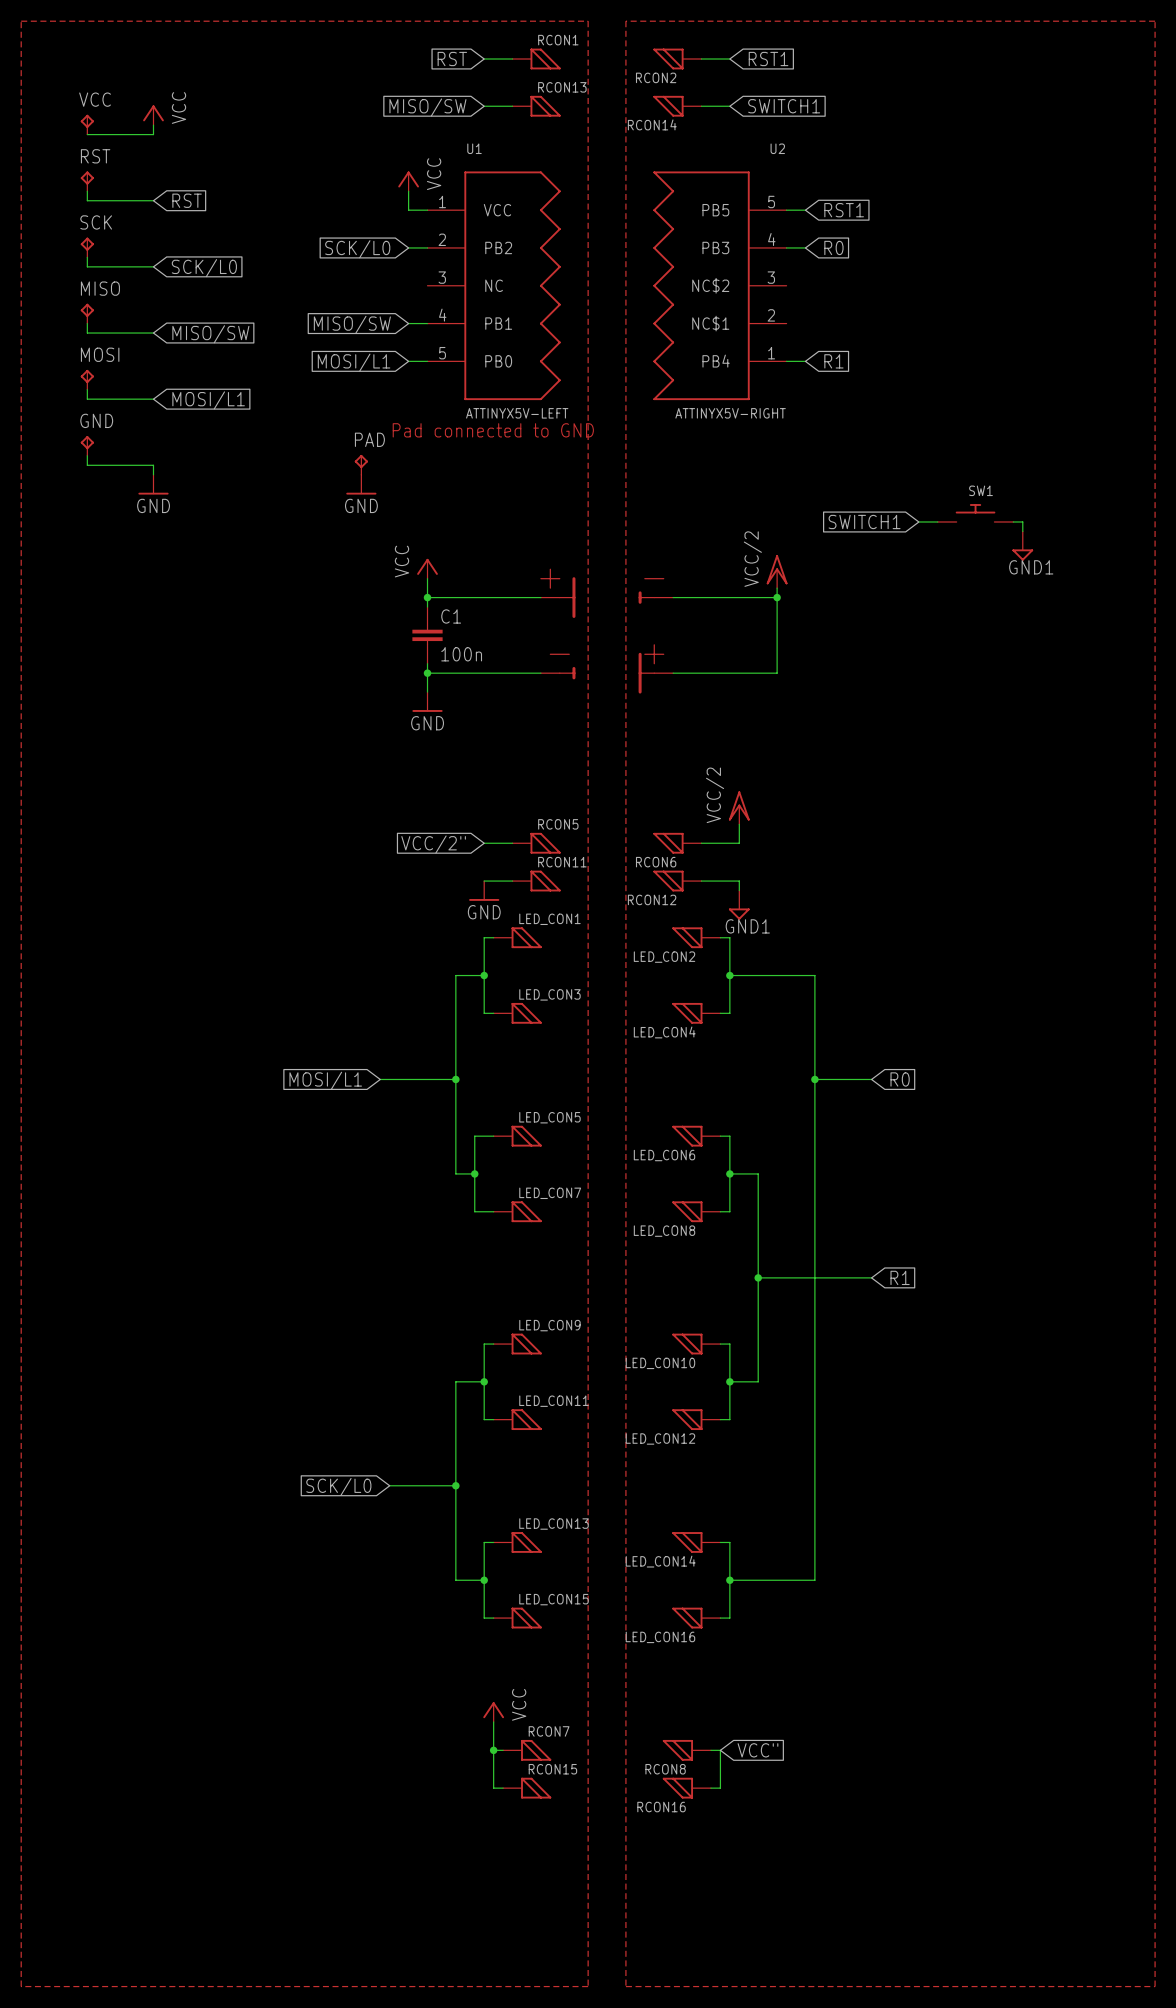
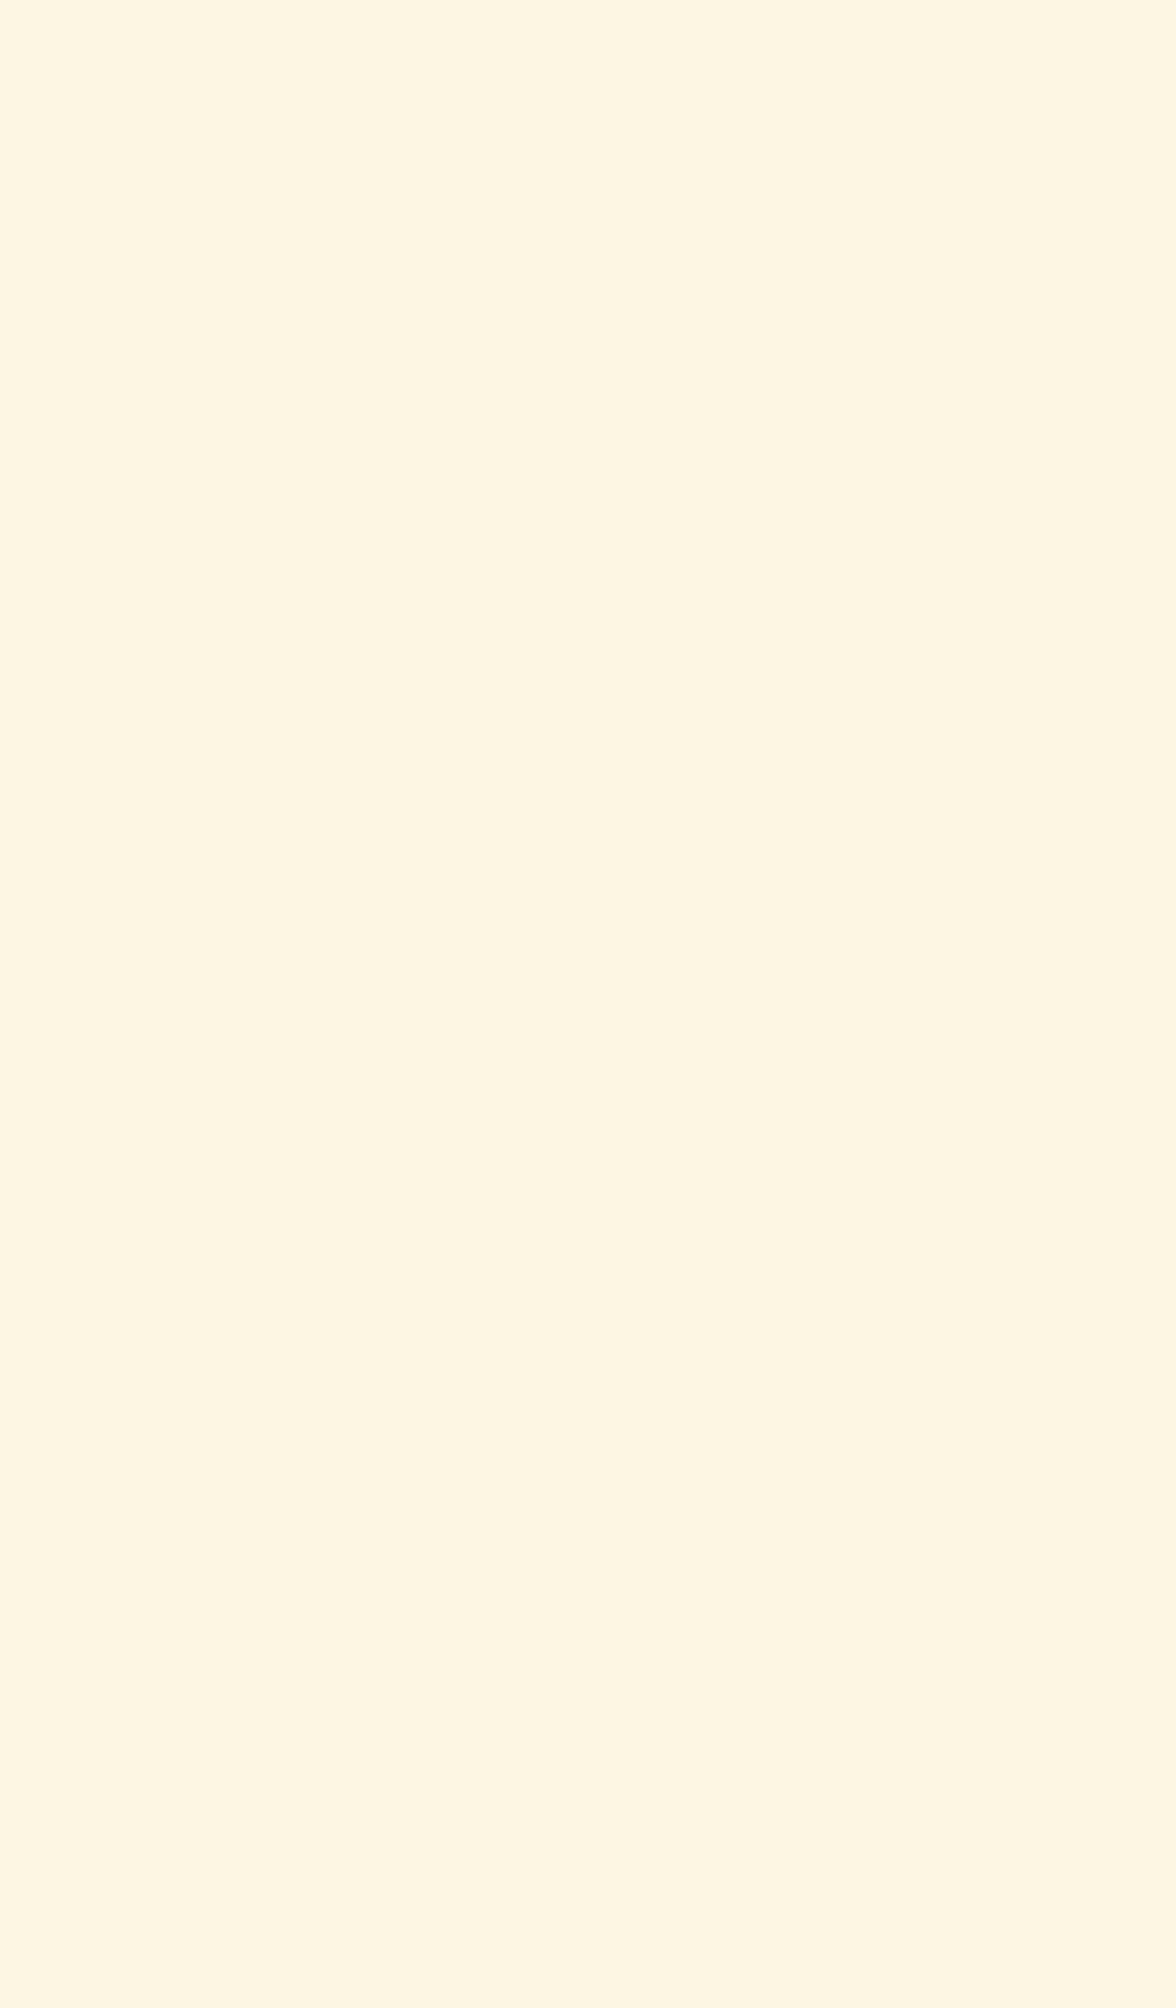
line: (21, 21) (588, 21) (588, 1986) (21, 1986) (21, 21) -> none
line: (625, 21) (1155, 21) (1155, 1986) (625, 1986) (625, 21) -> none
global label: RST (452, 59) -> none
wire: (484, 59) (512, 59) -> none
RCON1: (536, 59) -> none
RCON2: (677, 59) -> none
wire: (701, 59) (729, 59) -> none
global label: RST1 (768, 59) -> none
wire: (484, 106) (512, 106) -> none
RCON13: (536, 106) -> none
RCON14: (677, 106) -> none
wire: (701, 106) (729, 106) -> none
global label: SWITCH1 (784, 106) -> none
global label: MISO/SW (427, 107) -> none
power symbol: VCC (153, 115) -> none
VCC: (87, 124) -> none
wire: (153, 125) (153, 134) (87, 134) -> none
RST: (87, 181) -> none
power symbol: VCC (408, 181) -> none
wire: (87, 191) (87, 200) (153, 200) -> none
wire: (408, 191) (408, 210) (427, 210) -> none
global label: RST (187, 200) -> none
wire: (786, 210) (805, 210) -> none
global label: RST1 (844, 210) -> none
SCK: (87, 247) -> none
wire: (408, 247) (427, 247) -> none
wire: (786, 247) (805, 247) -> none
global label: R0 (833, 247) -> none
global label: SCK/L0 (357, 249) -> none
wire: (87, 257) (87, 266) (153, 266) -> none
global label: SCK/L0 (204, 268) -> none
U1: ATTINYX5V-LEFT (494, 285) -> none
U2: ATTINYX5V-RIGHT (719, 285) -> none
MISO: (87, 313) -> none
wire: (87, 323) (87, 333) (153, 333) -> none
wire: (408, 323) (427, 323) -> none
global label: MISO/SW (352, 324) -> none
global label: MISO/SW (210, 334) -> none
wire: (408, 361) (427, 361) -> none
wire: (786, 361) (805, 361) -> none
global label: R1 (833, 361) -> none
global label: MOSI/L1 (354, 362) -> none
MOSI: (87, 379) -> none
wire: (87, 389) (87, 399) (153, 399) -> none
global label: MOSI/L1 (208, 400) -> none
text: Pad connected to GND (493, 430) -> none
GND: (87, 445) -> none
wire: (87, 455) (87, 465) (153, 465) (153, 474) -> none
PAD: (361, 464) -> none
power symbol: GND (153, 484) -> none
power symbol: GND (361, 484) -> none
SW1: (975, 513) -> none
global label: SWITCH1 (864, 521) -> none
wire: (918, 521) (937, 521) -> none
wire: (1013, 521) (1022, 521) (1022, 531) -> none
power symbol: GND1 (1022, 546) -> none
power symbol: VCC (427, 568) -> none
line: (550, 569) (550, 588) -> none
power symbol: VCC/2 (777, 571) -> none
wire: (427, 578) (427, 607) -> none
line: (540, 578) (559, 578) -> none
line: (644, 578) (663, 578) -> none
wire: (777, 588) (777, 673) (673, 673) -> none
wire: (427, 597) (540, 597) -> none
junction: (427, 597) -> none
part: (558, 597) -> none
part: (655, 597) -> none
wire: (673, 597) (777, 597) -> none
junction: (777, 597) -> none
C1: 100n (427, 635) -> none
line: (654, 644) (654, 663) -> none
line: (550, 654) (569, 654) -> none
line: (644, 654) (663, 654) -> none
wire: (427, 663) (427, 692) -> none
wire: (427, 673) (540, 673) -> none
junction: (427, 673) -> none
part: (558, 673) -> none
part: (655, 673) -> none
power symbol: GND (427, 701) -> none
power symbol: VCC/2 (739, 807) -> none
wire: (739, 824) (739, 843) (701, 843) -> none
wire: (484, 843) (512, 843) -> none
RCON5: (536, 843) -> none
RCON6: (677, 843) -> none
global label: VCC/2" (433, 844) -> none
wire: (484, 881) (512, 881) -> none
RCON11: (536, 881) -> none
RCON12: (677, 881) -> none
wire: (701, 881) (739, 881) (739, 890) -> none
power symbol: GND (484, 890) -> none
power symbol: GND1 (739, 905) -> none
wire: (493, 937) (484, 937) (484, 1013) (493, 1013) -> none
LED_CON1: (517, 937) -> none
LED_CON2: (696, 937) -> none
wire: (720, 937) (729, 937) (729, 1013) (720, 1013) -> none
wire: (484, 975) (455, 975) (455, 1173) (474, 1173) -> none
junction: (484, 975) -> none
wire: (729, 975) (814, 975) (814, 1580) (729, 1580) -> none
junction: (729, 975) -> none
LED_CON3: (517, 1013) -> none
LED_CON4: (696, 1013) -> none
wire: (380, 1079) (455, 1079) -> none
junction: (455, 1079) -> none
wire: (814, 1079) (871, 1079) -> none
junction: (814, 1079) -> none
global label: R0 (900, 1079) -> none
global label: MOSI/L1 (325, 1080) -> none
wire: (493, 1136) (474, 1136) (474, 1211) (493, 1211) -> none
LED_CON5: (517, 1136) -> none
LED_CON6: (696, 1136) -> none
wire: (720, 1136) (729, 1136) (729, 1211) (720, 1211) -> none
junction: (474, 1173) -> none
wire: (729, 1173) (758, 1173) (758, 1381) (729, 1381) -> none
junction: (729, 1173) -> none
LED_CON7: (517, 1211) -> none
LED_CON8: (696, 1211) -> none
wire: (758, 1277) (871, 1277) -> none
junction: (758, 1277) -> none
global label: R1 (900, 1277) -> none
wire: (493, 1344) (484, 1344) (484, 1419) (493, 1419) -> none
LED_CON9: (517, 1344) -> none
LED_CON10: (696, 1344) -> none
wire: (720, 1344) (729, 1344) (729, 1419) (720, 1419) -> none
wire: (484, 1381) (455, 1381) (455, 1580) (484, 1580) -> none
junction: (484, 1381) -> none
junction: (729, 1381) -> none
LED_CON11: (517, 1419) -> none
LED_CON12: (696, 1419) -> none
wire: (389, 1485) (455, 1485) -> none
junction: (455, 1485) -> none
global label: SCK/L0 (338, 1487) -> none
wire: (493, 1542) (484, 1542) (484, 1618) (493, 1618) -> none
LED_CON13: (517, 1542) -> none
LED_CON14: (696, 1542) -> none
wire: (720, 1542) (729, 1542) (729, 1618) (720, 1618) -> none
junction: (484, 1580) -> none
junction: (729, 1580) -> none
LED_CON15: (517, 1618) -> none
LED_CON16: (696, 1618) -> none
power symbol: VCC (493, 1712) -> none
wire: (493, 1721) (493, 1788) (503, 1788) -> none
wire: (493, 1750) (503, 1750) -> none
junction: (493, 1750) -> none
RCON7: (527, 1750) -> none
RCON8: (686, 1750) -> none
wire: (710, 1750) (720, 1750) (720, 1788) (710, 1788) -> none
global label: VCC" (757, 1750) -> none
RCON15: (527, 1788) -> none
RCON16: (686, 1788) -> none

